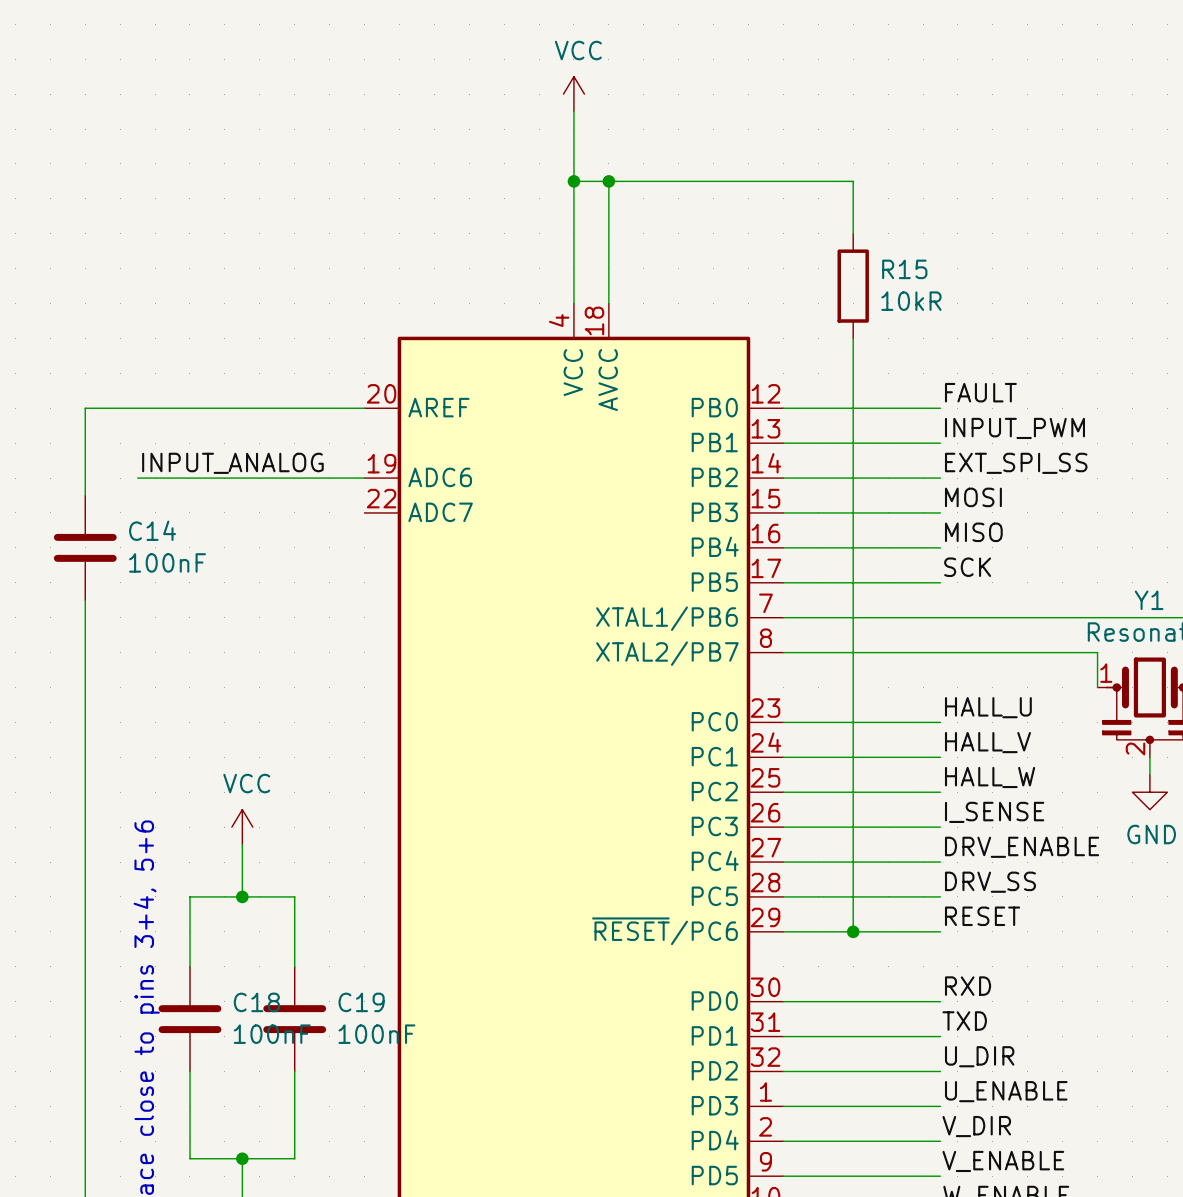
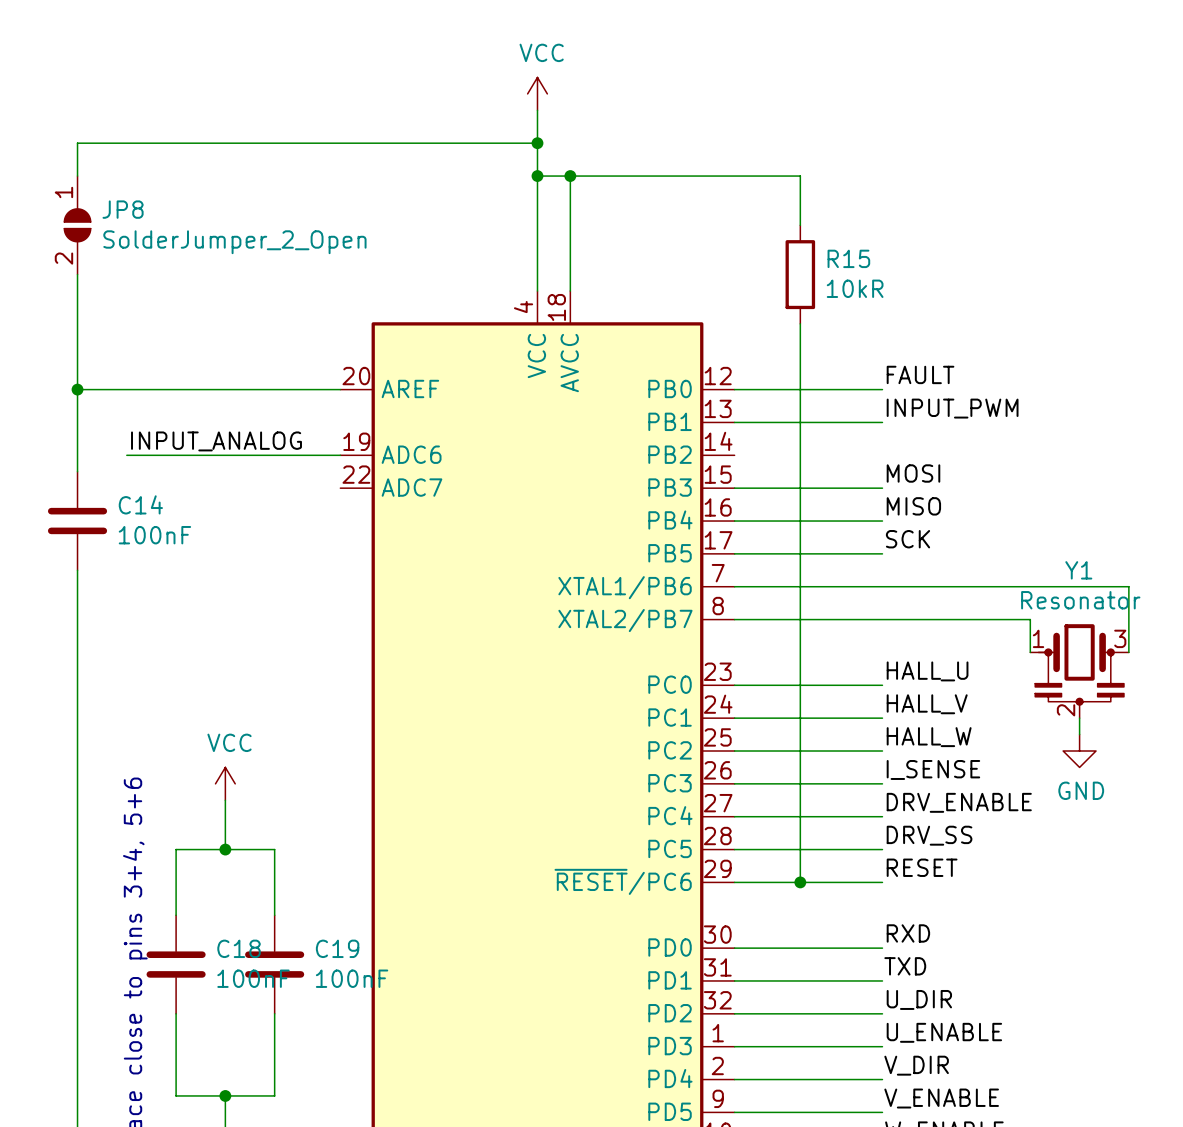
wire: none -> (537, 143) (77, 143) (77, 176)
junction: none -> (537, 143)
JP8: none -> SolderJumper_2_Open (77, 225)
wire: none -> (77, 274) (77, 389)
junction: none -> (77, 389)
label: EXT_SPI_SS (1016, 463) -> none
wire: (783, 478) (940, 478) -> none

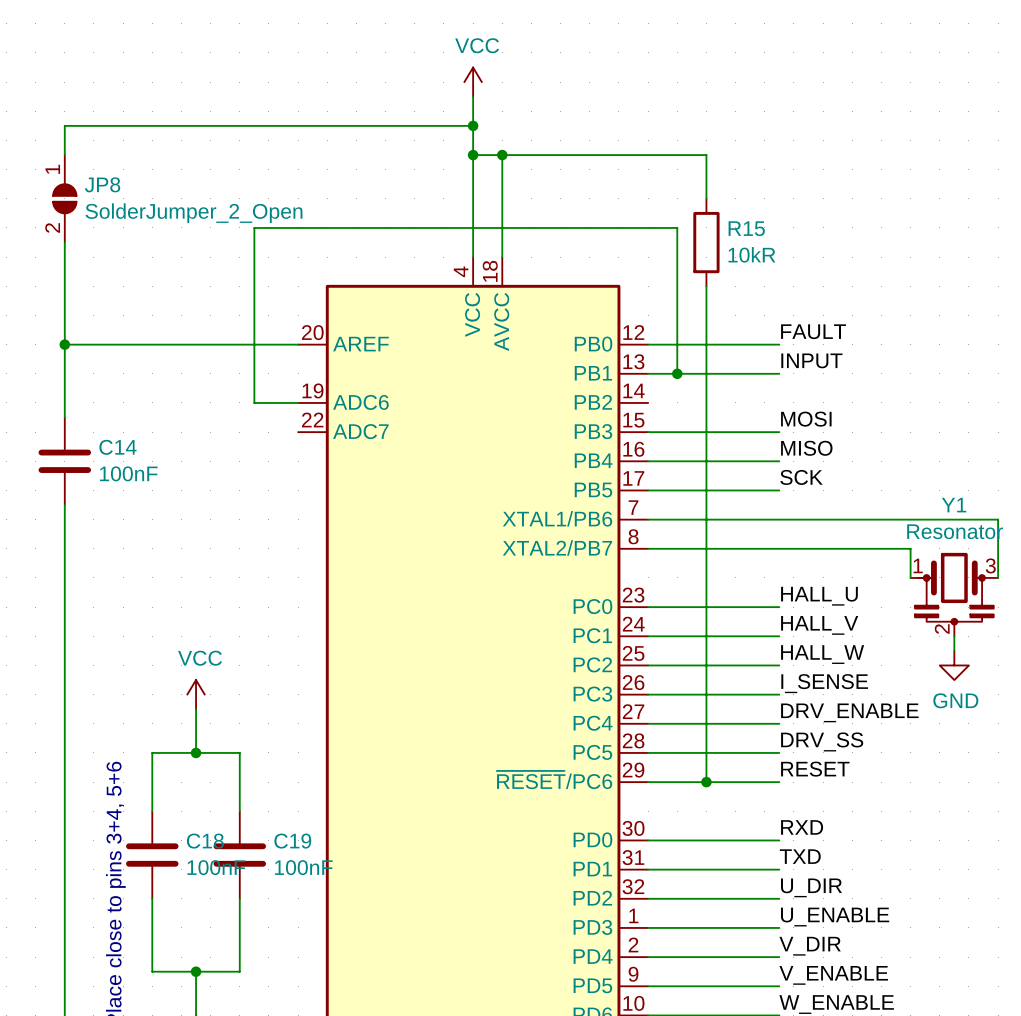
label: INPUT_PWM (952, 408) -> INPUT (811, 360)
junction: none -> (677, 373)
label: INPUT_ANALOG (216, 441) -> none
wire: (126, 455) (291, 455) -> (677, 373) (677, 227) (254, 227) (254, 402)

